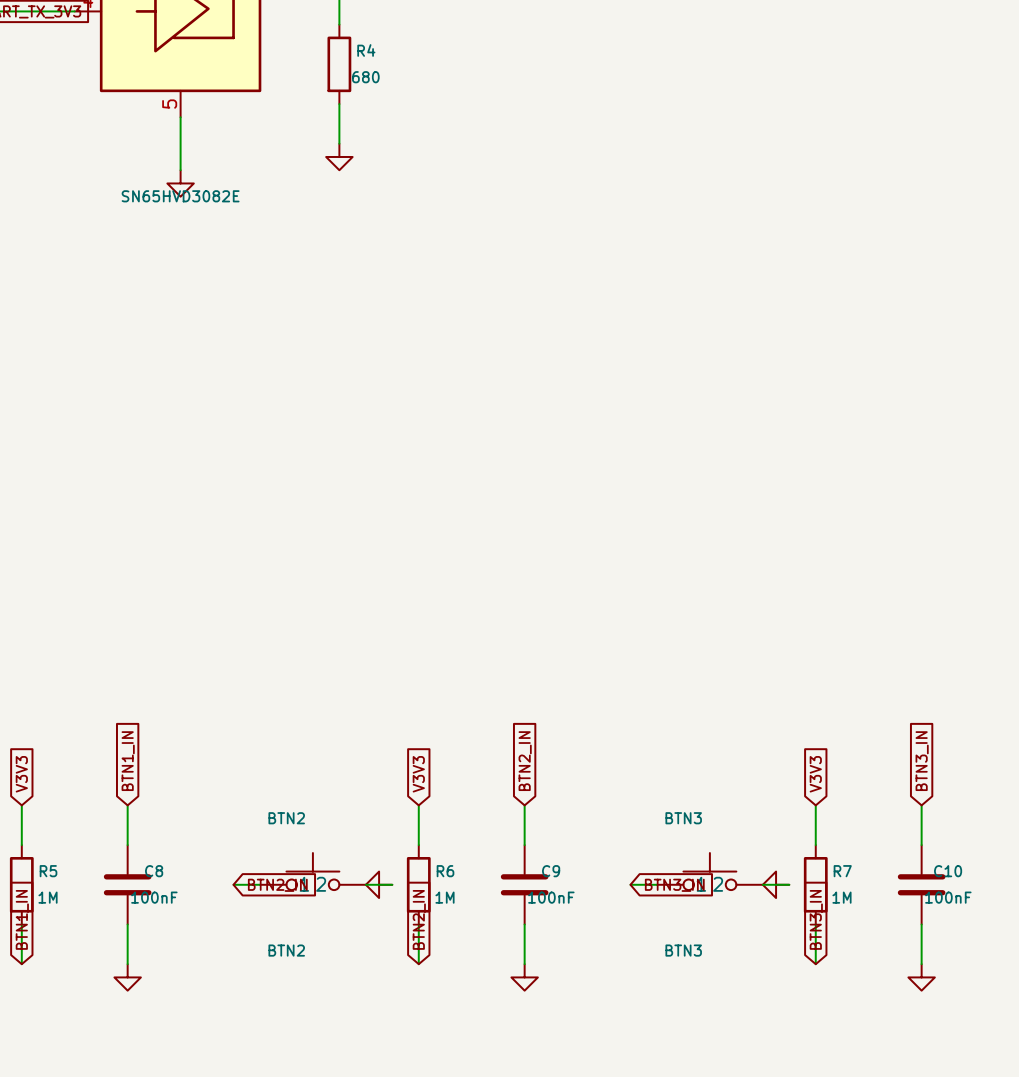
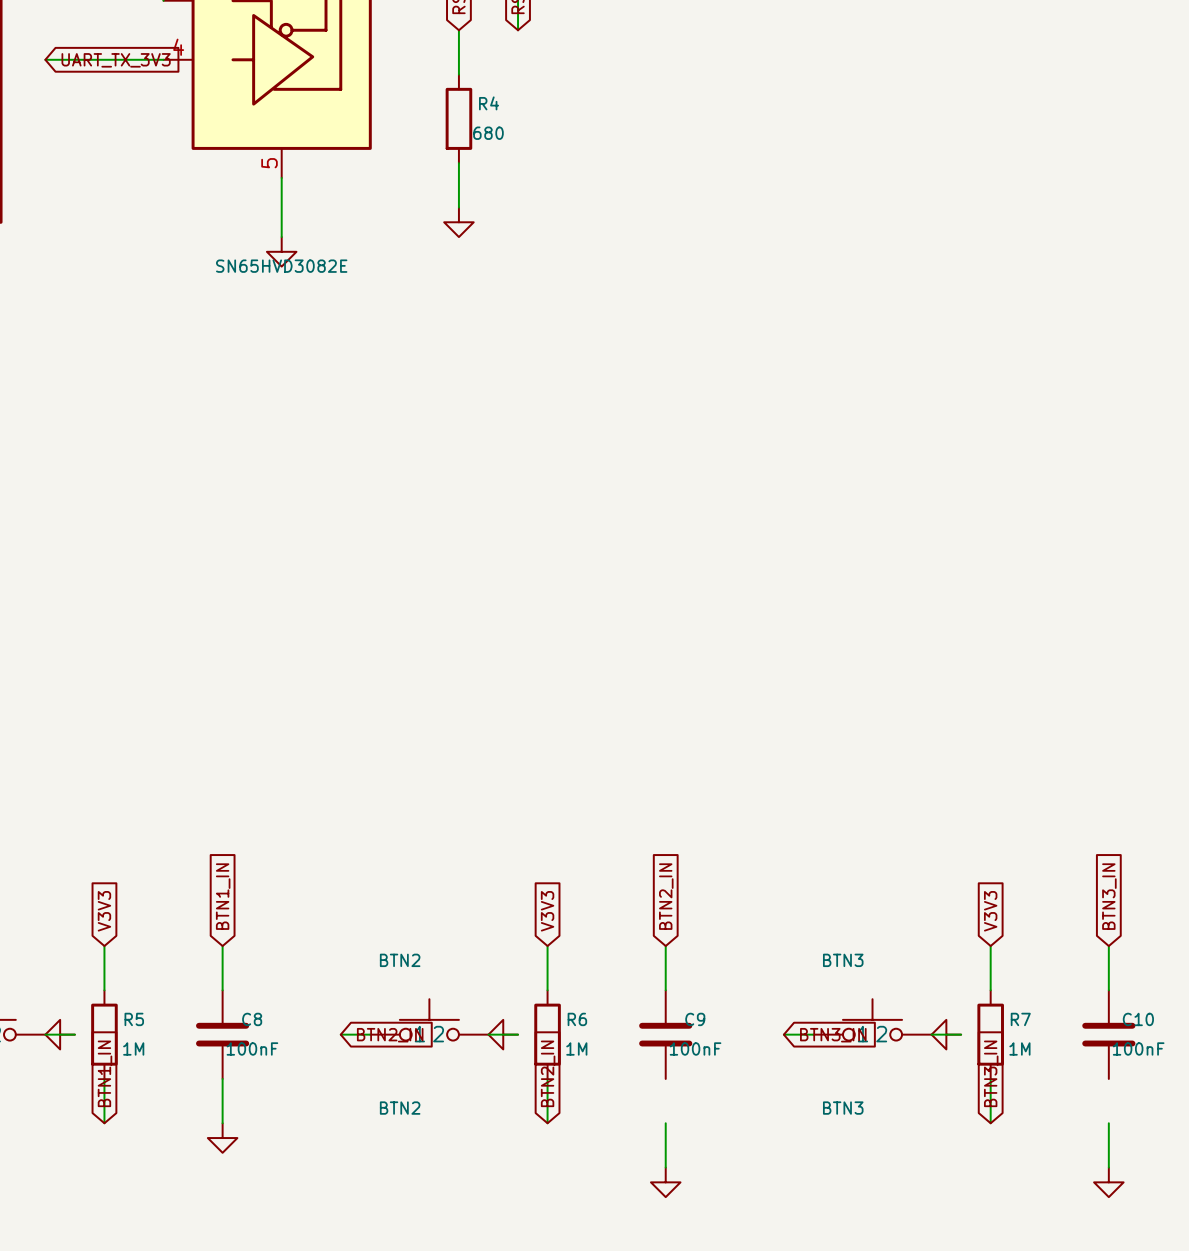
wire: (524, 924) (524, 964) -> (665, 1167) (665, 1123)
wire: (921, 924) (921, 964) -> (1108, 1167) (1108, 1123)
power symbol position: (524, 977) -> (665, 1182)
power symbol position: (921, 977) -> (1108, 1182)

